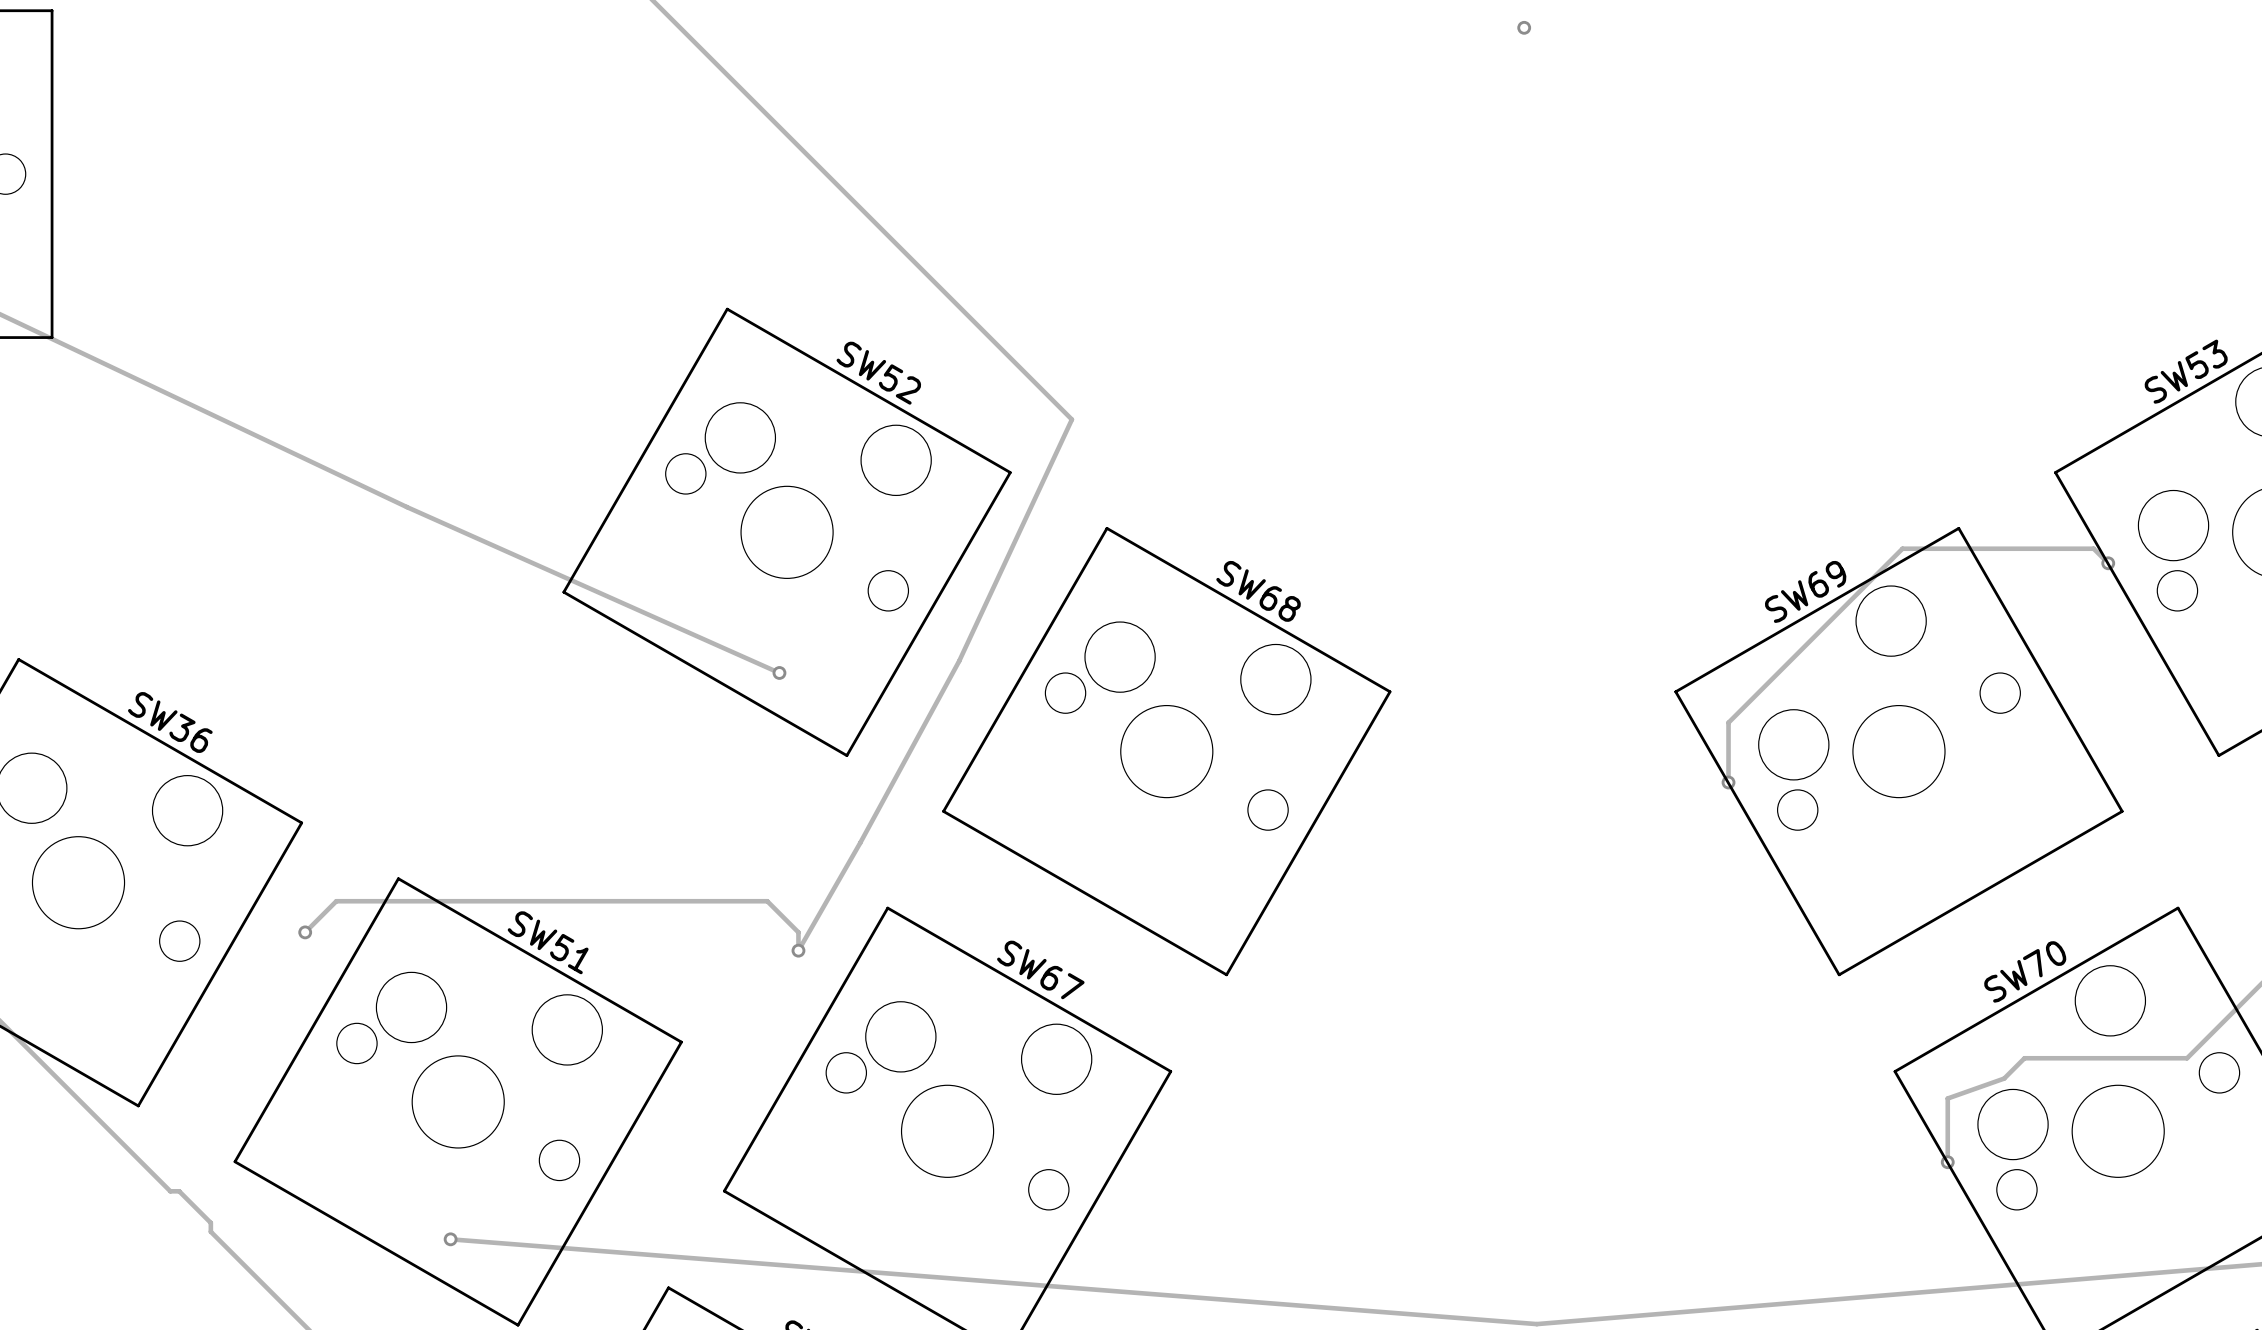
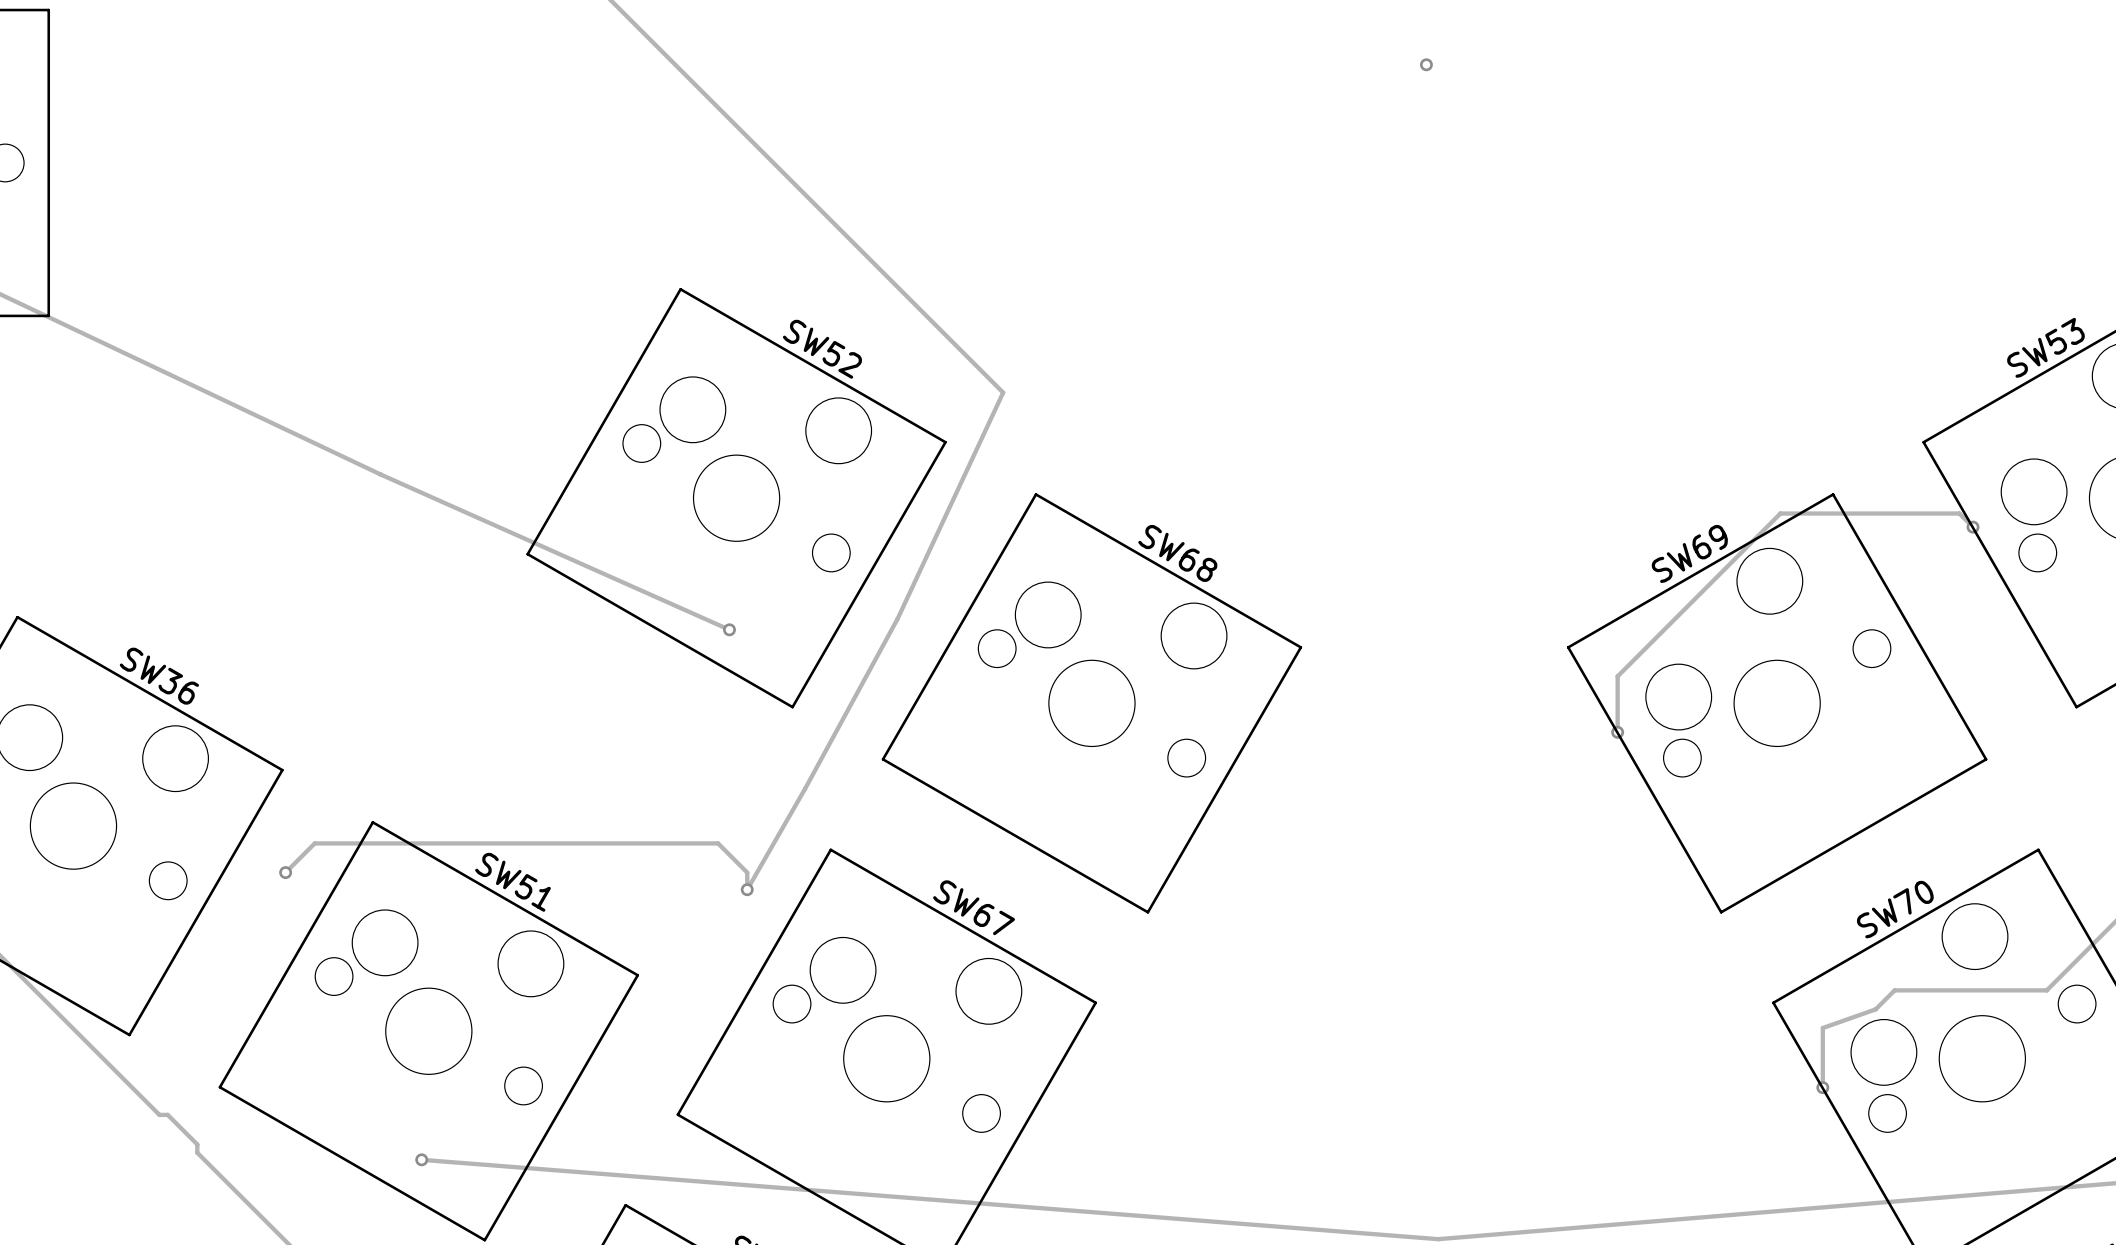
via position: (1524, 27) -> (1426, 64)

